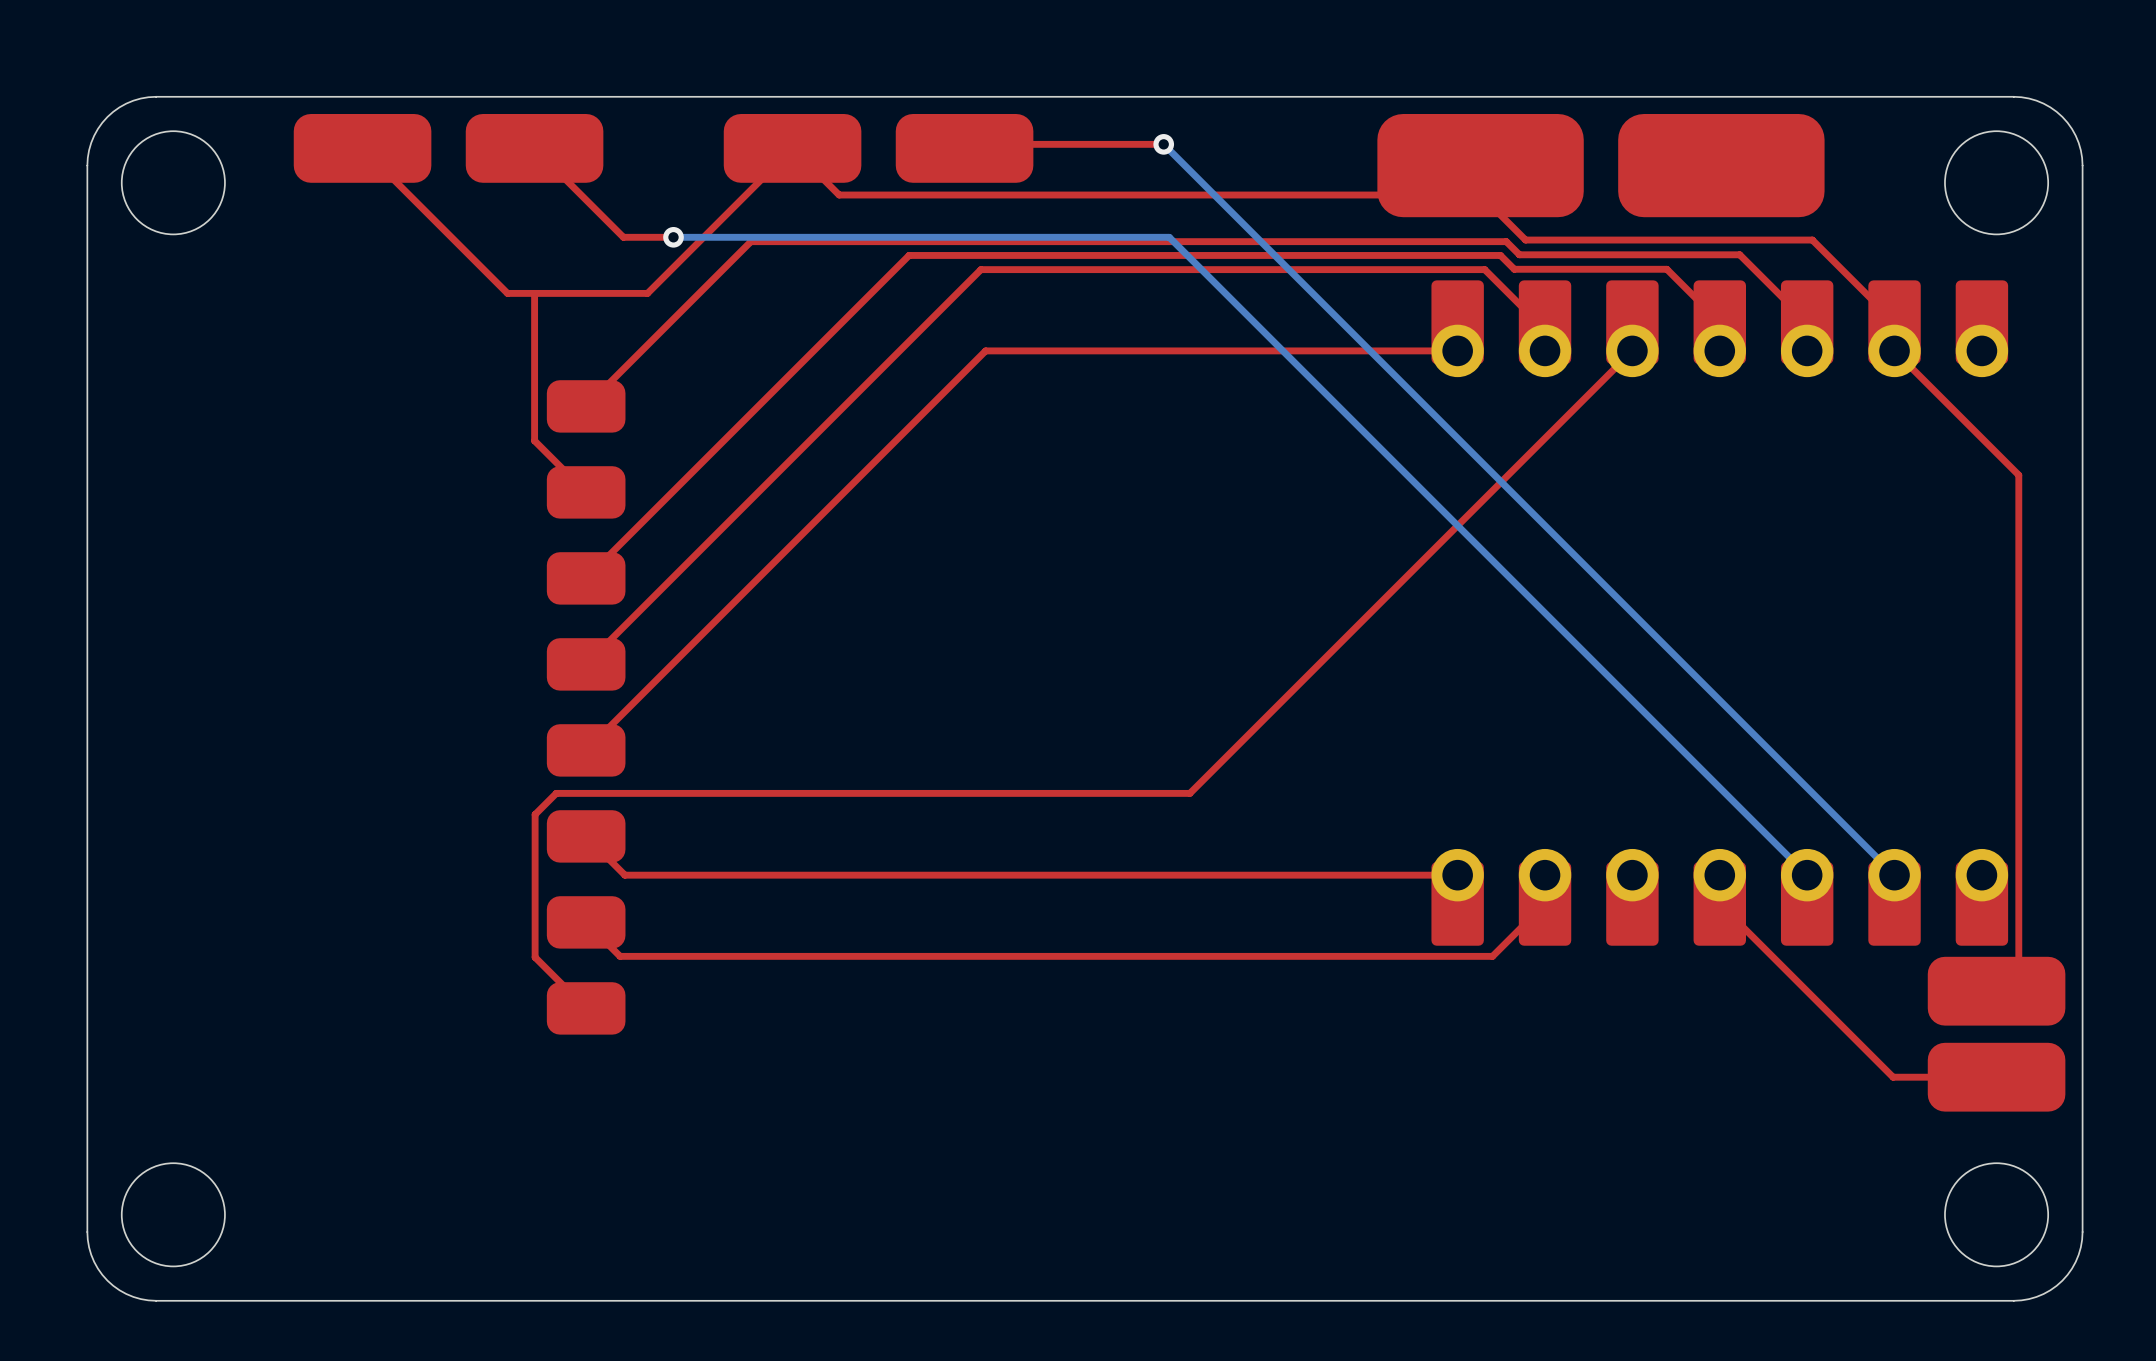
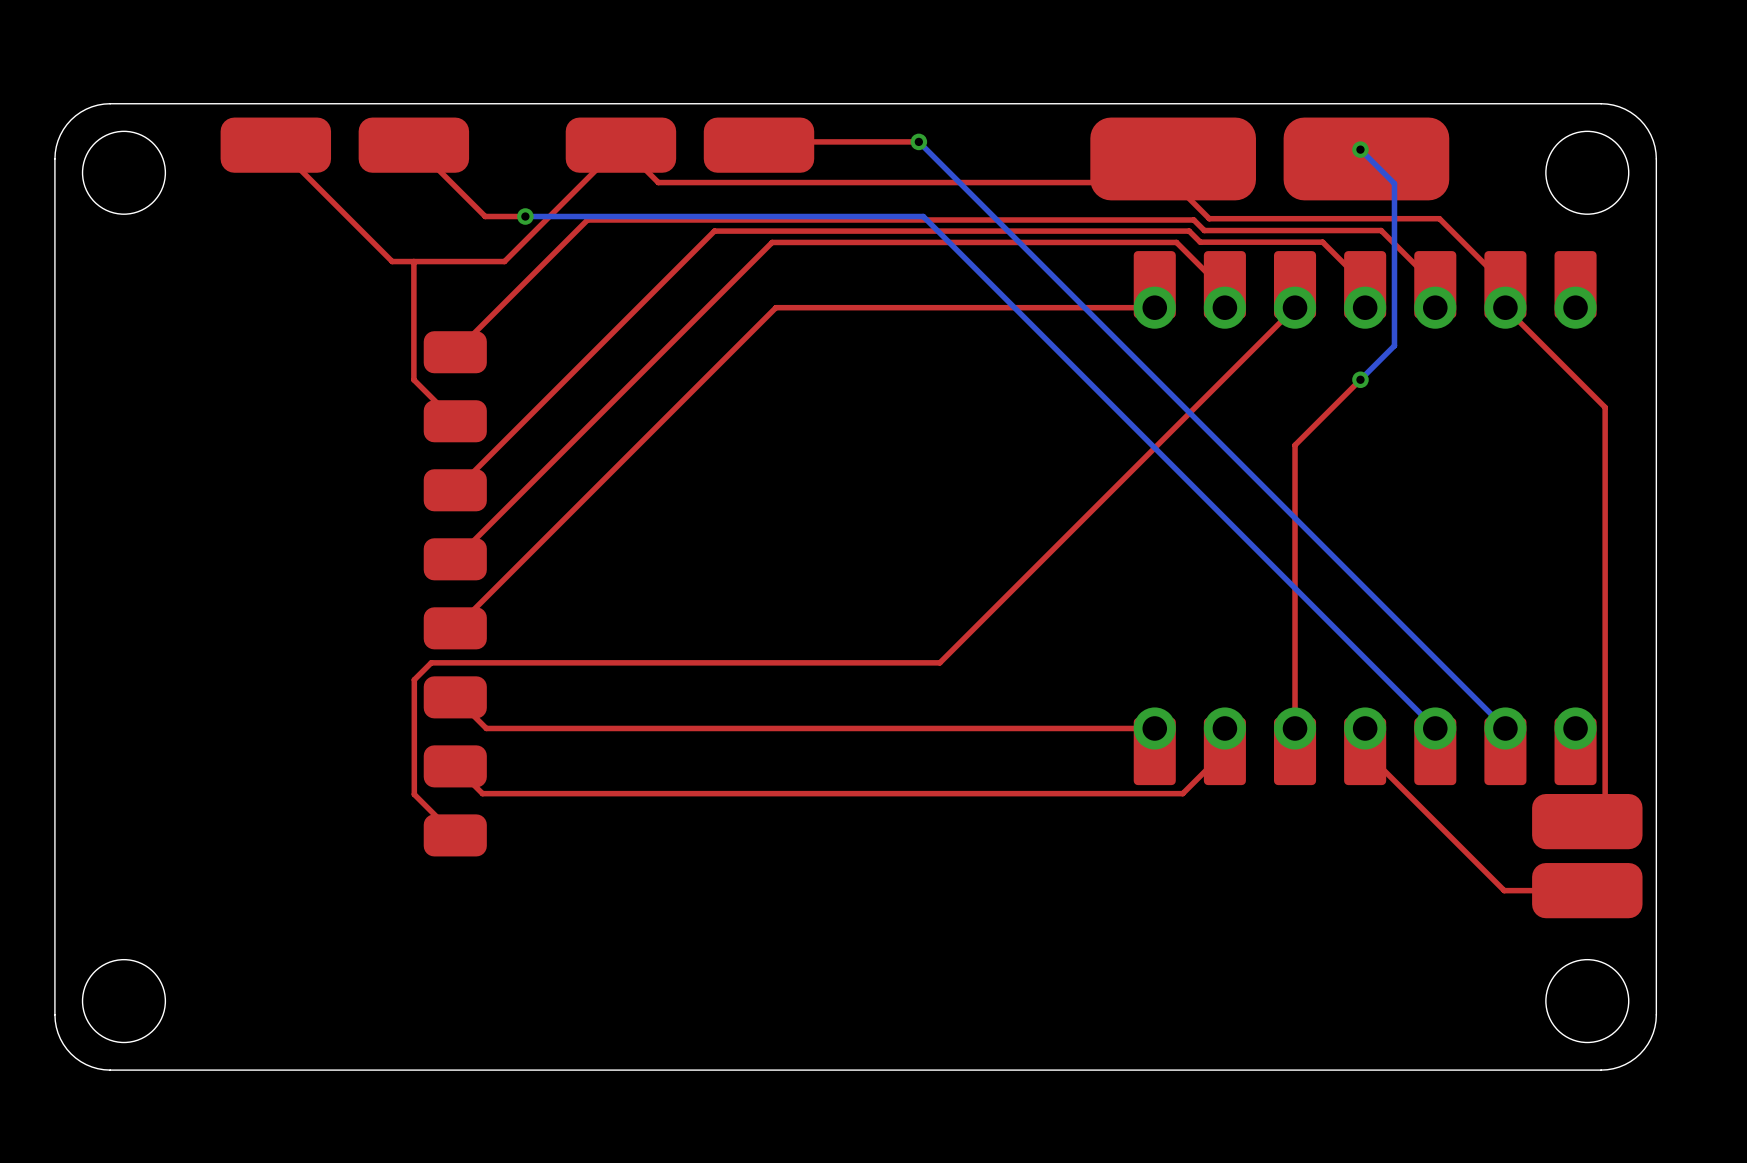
bottom track: none -> (1360, 149) (1394, 183) (1394, 345) (1360, 379)
via: none -> (1360, 149)
top track: none -> (1360, 379) (1295, 445) (1295, 728)
via: none -> (1360, 379)

